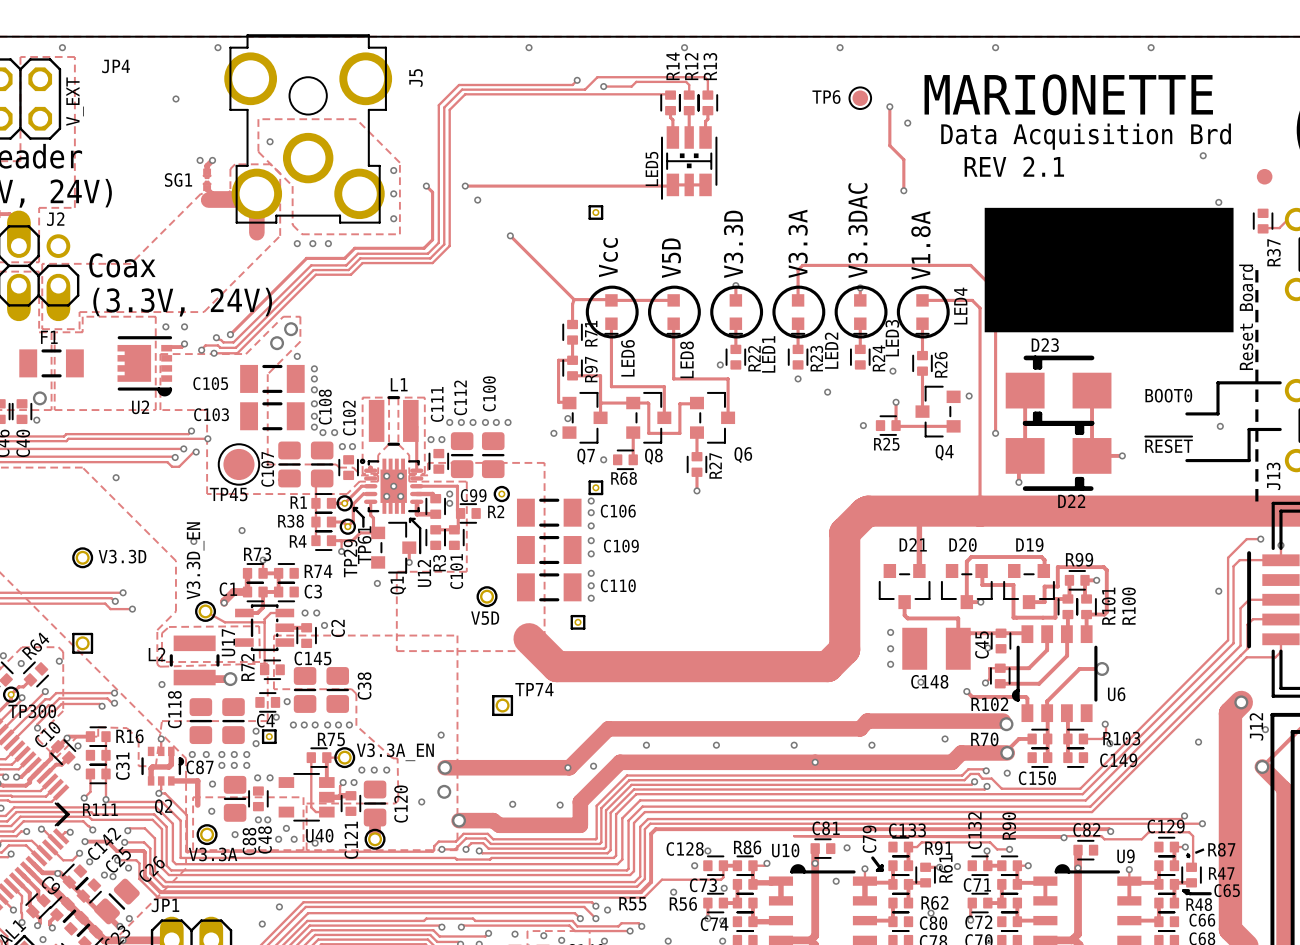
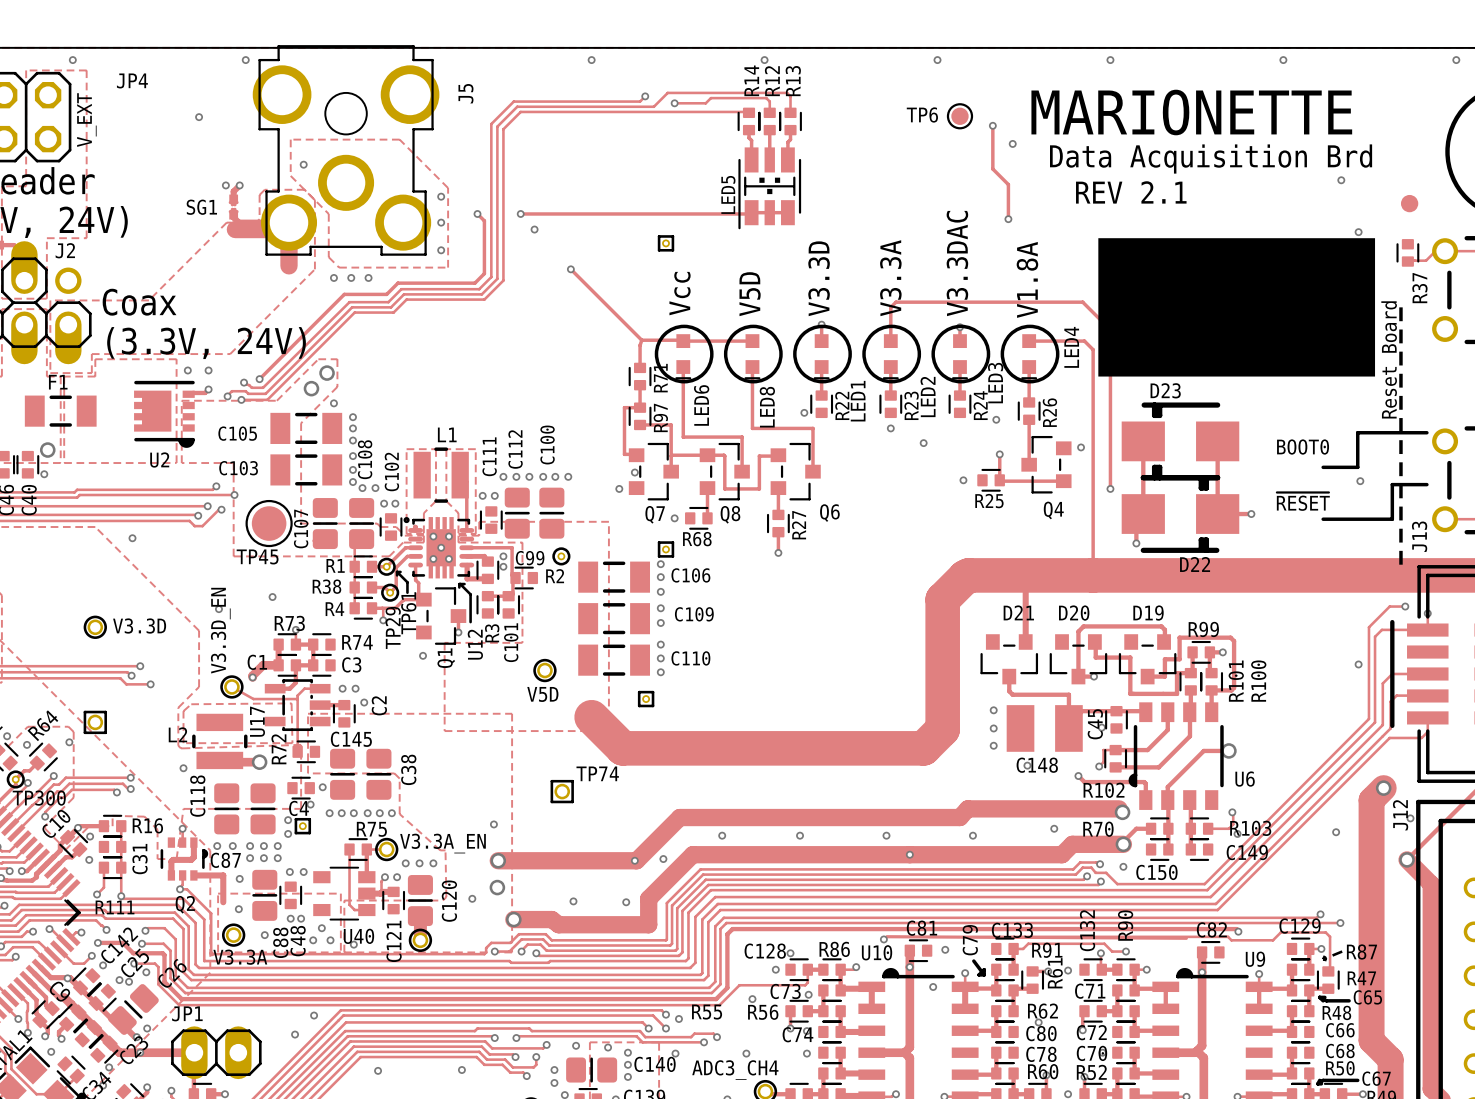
via: (1064, 837) -> none
via: none -> (883, 939)

